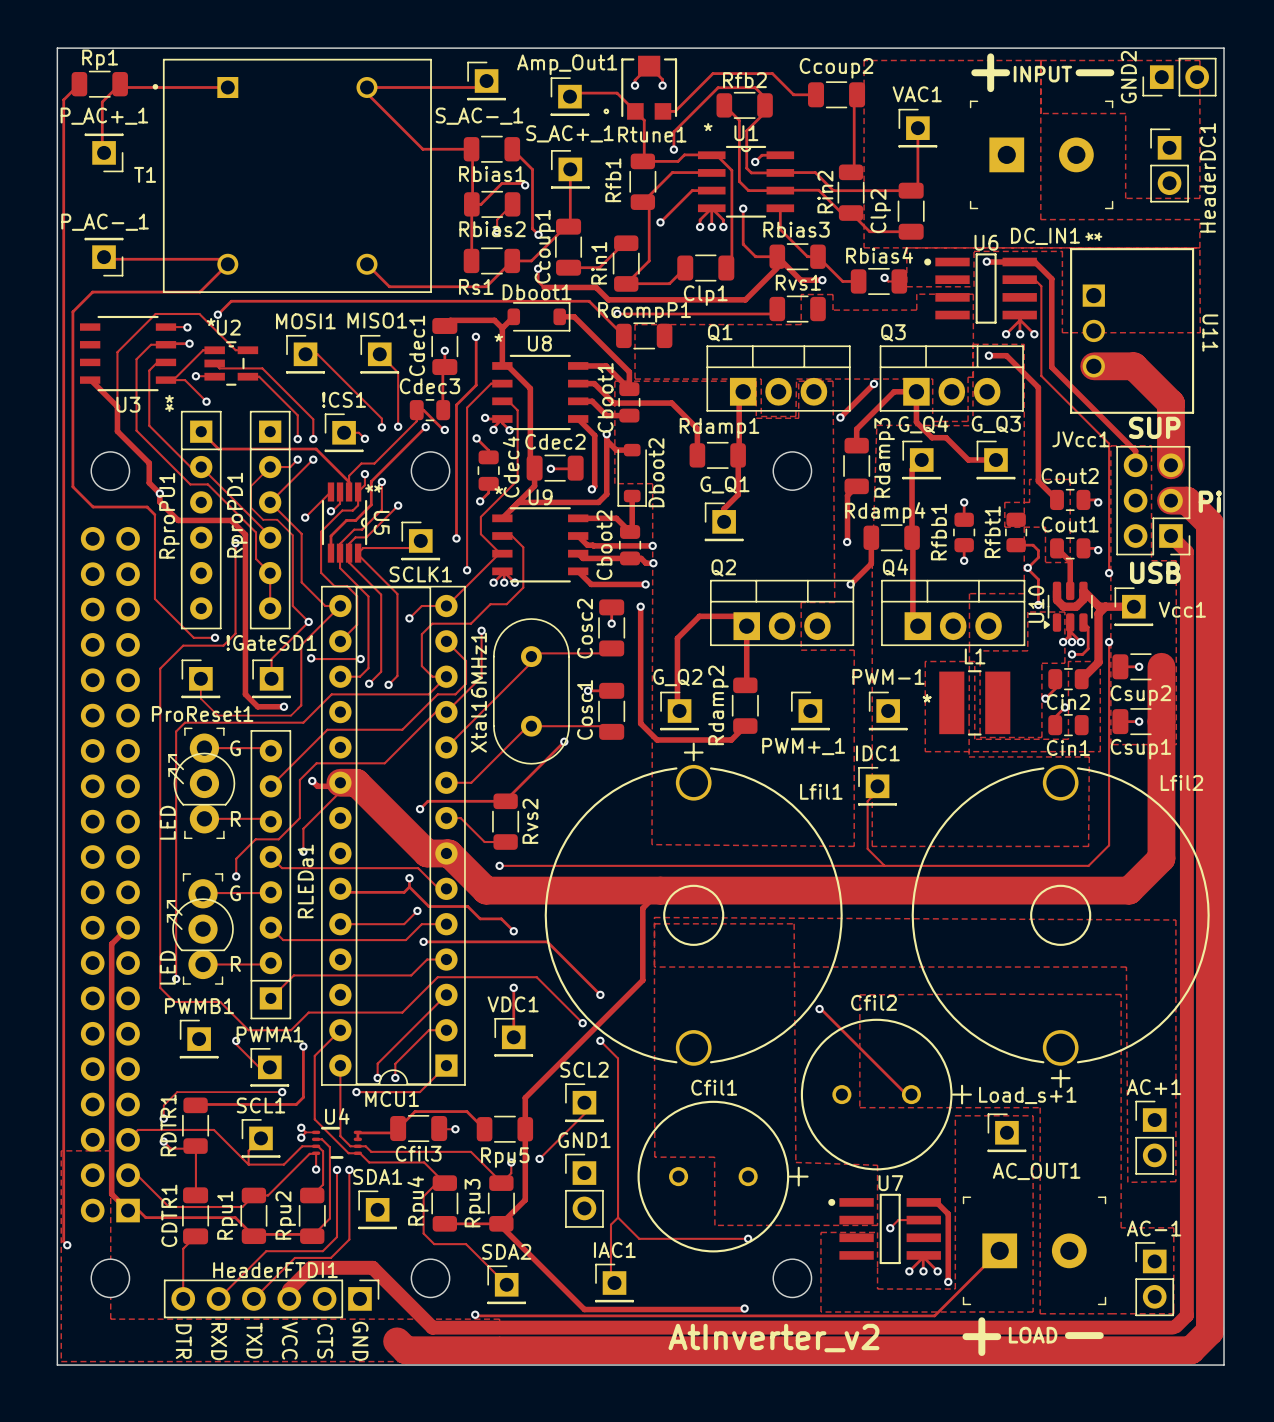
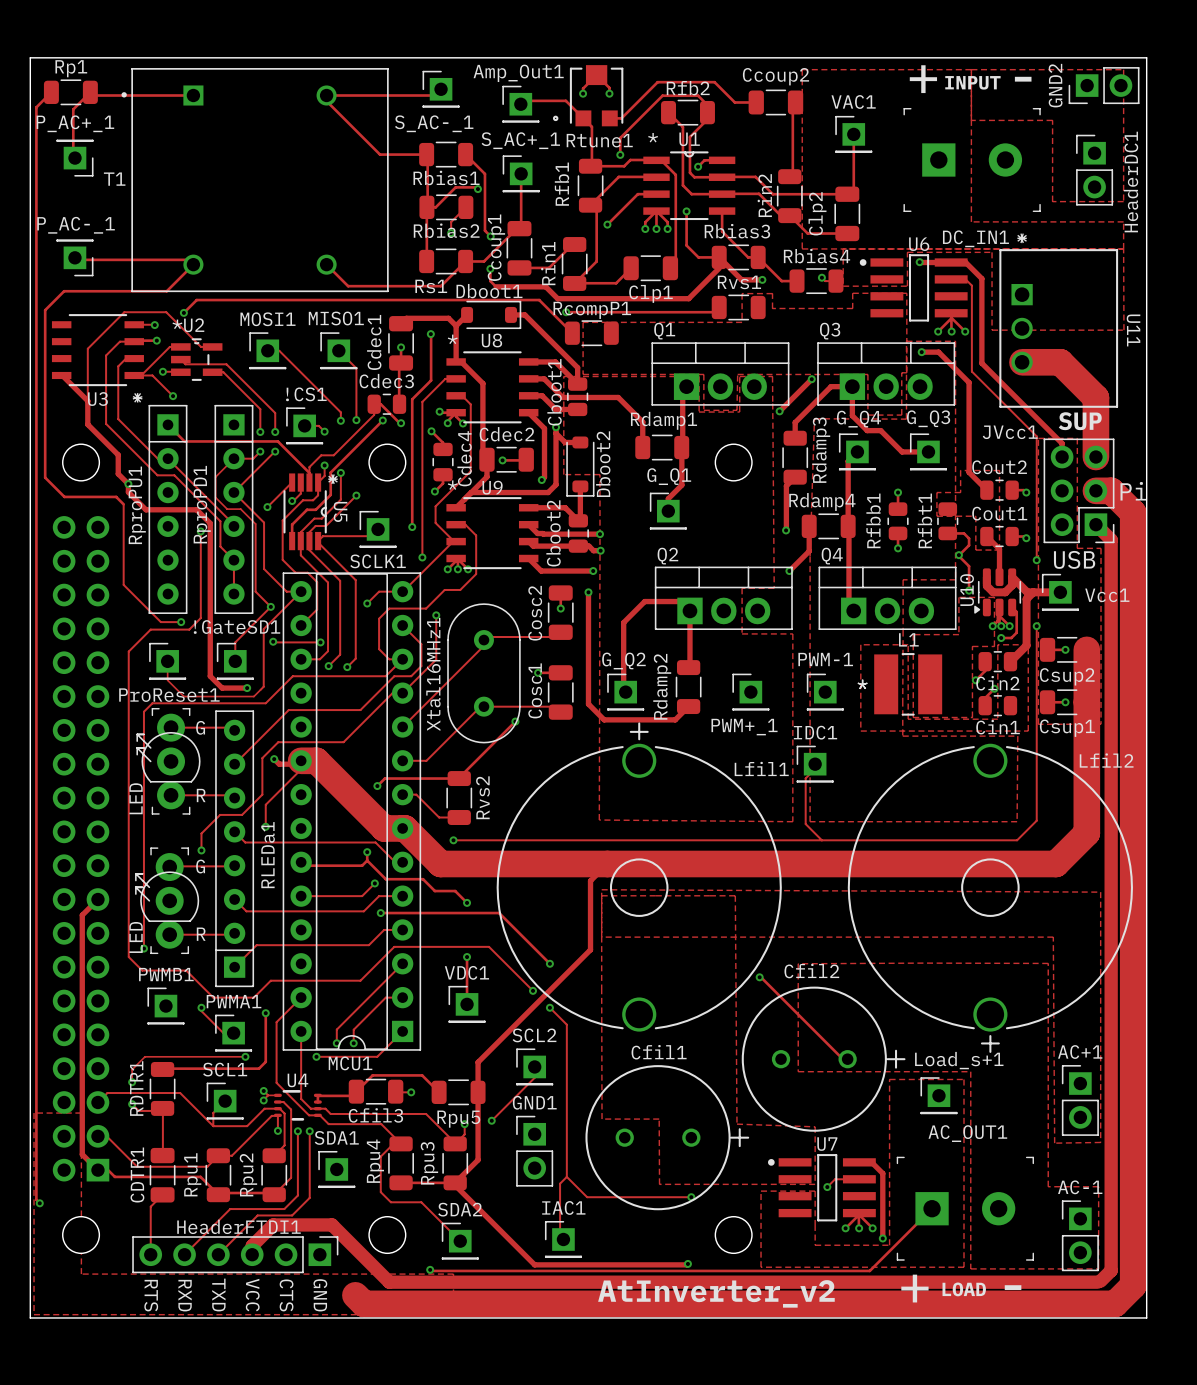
HeaderFTDI1 text: DTR (183, 1341) -> RTS (151, 1295)

